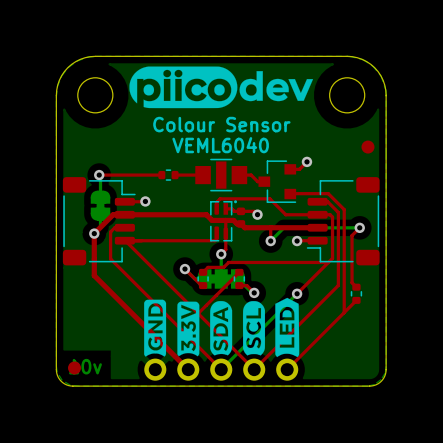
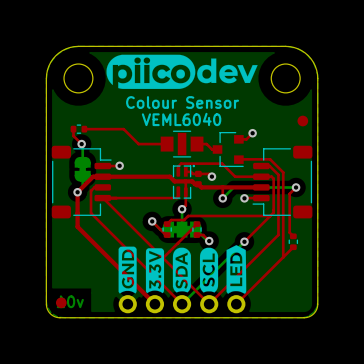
top track: none -> (84, 129) (123, 129) (138, 144) (144, 144)
top track: (99, 175) (161, 175) -> (81, 144) (73, 135) (73, 129)
part position: (168, 175) -> (78, 129)

